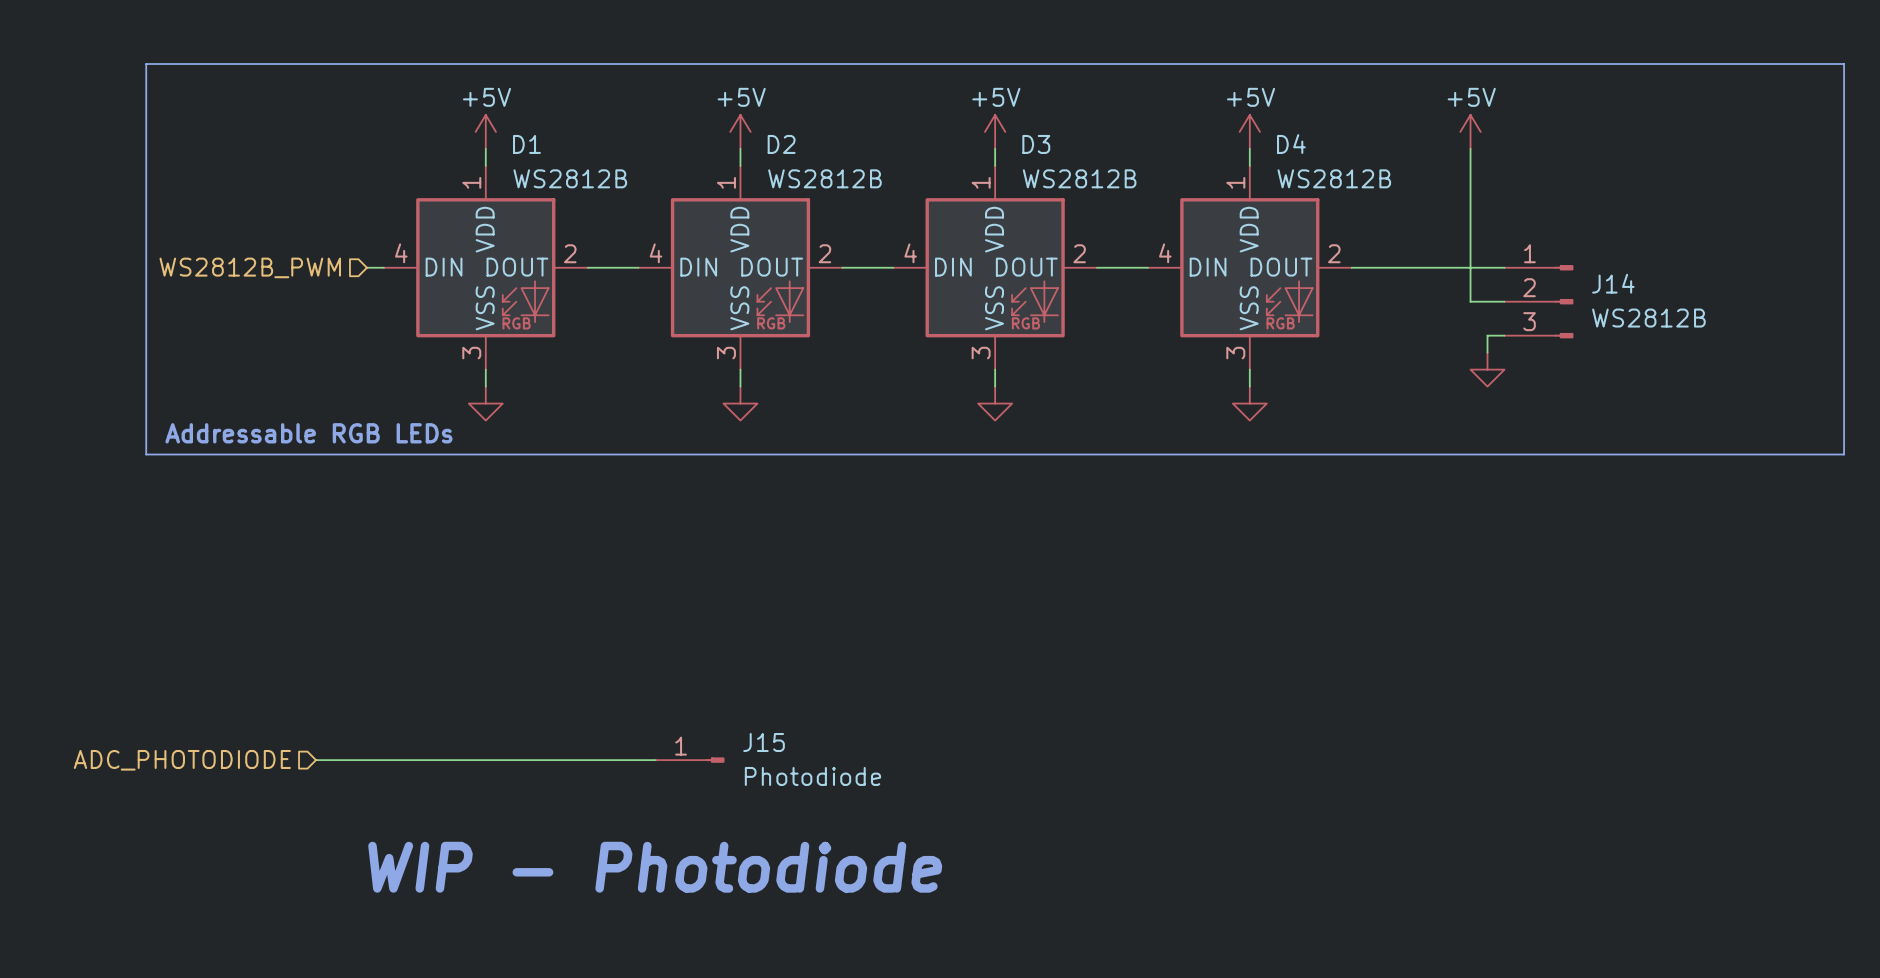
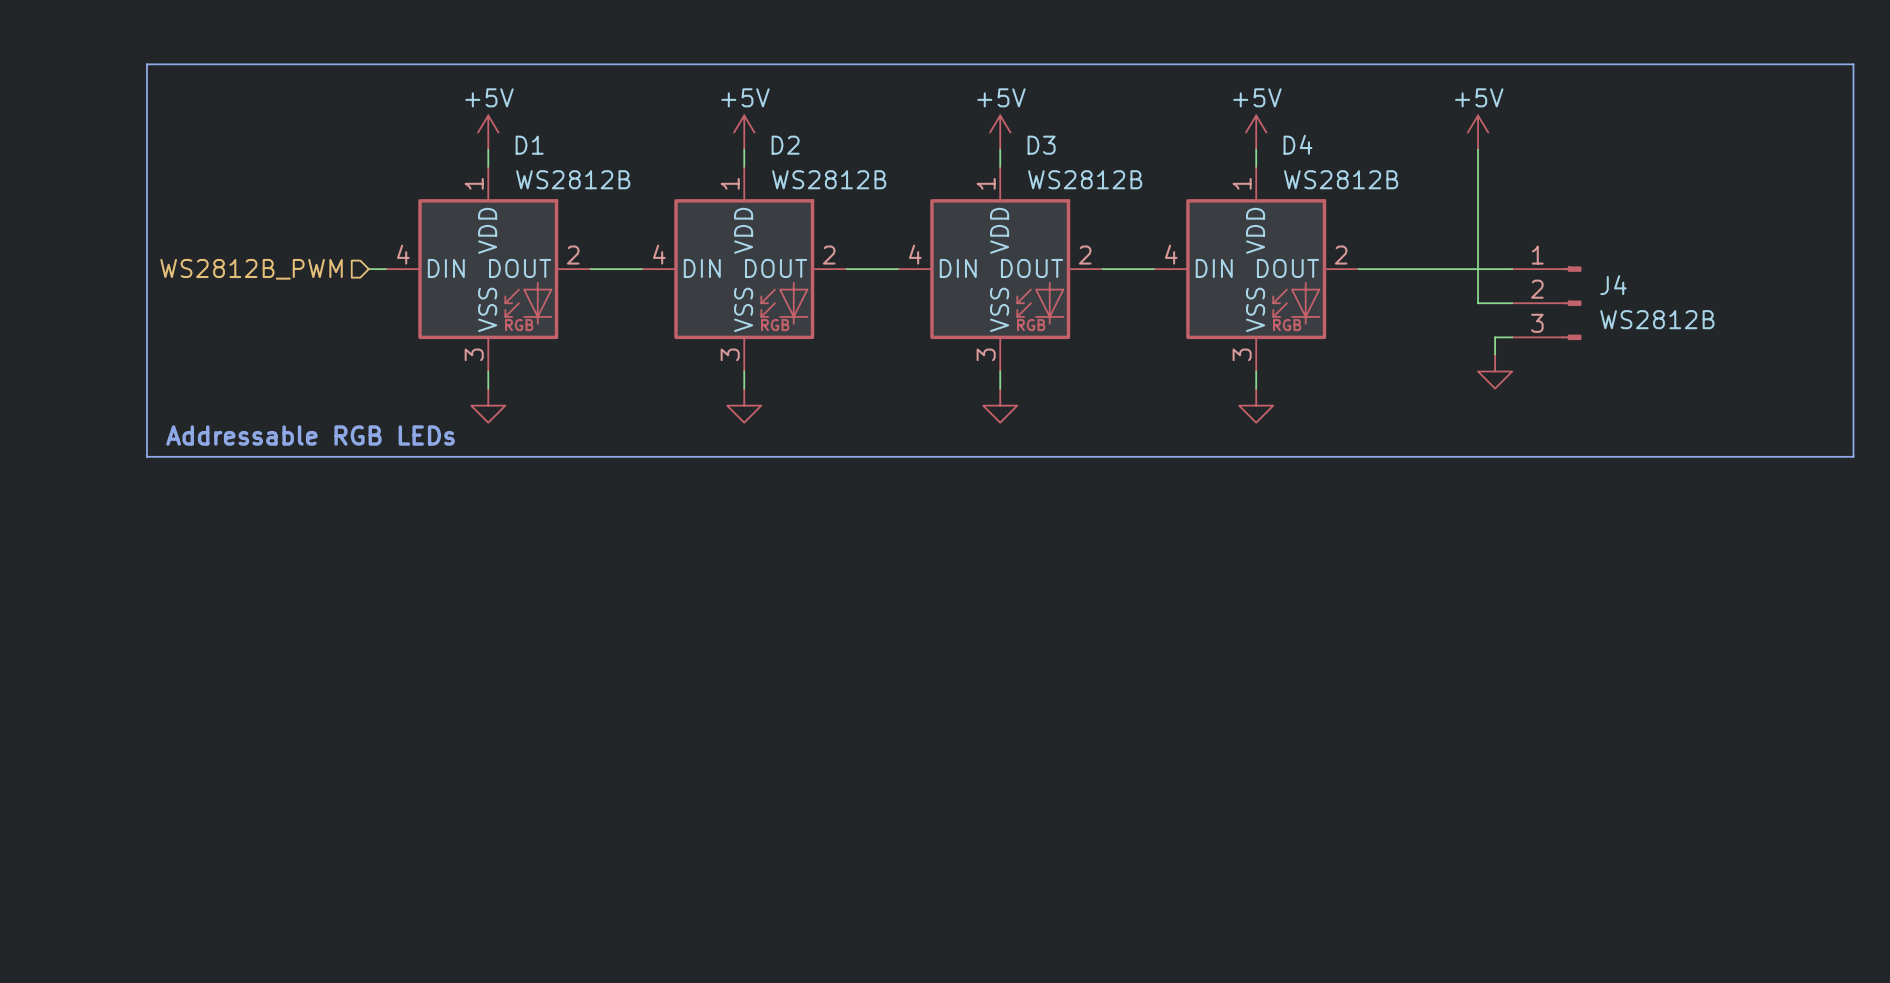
J14 name: J14 (1613, 283) -> J4 (1613, 285)
hierarchical label: ADC_PHOTODIODE (182, 760) -> none
wire: (316, 760) (655, 760) -> none
J15: Photodiode (690, 760) -> none
text: WIP - Photodiode (655, 867) -> none

